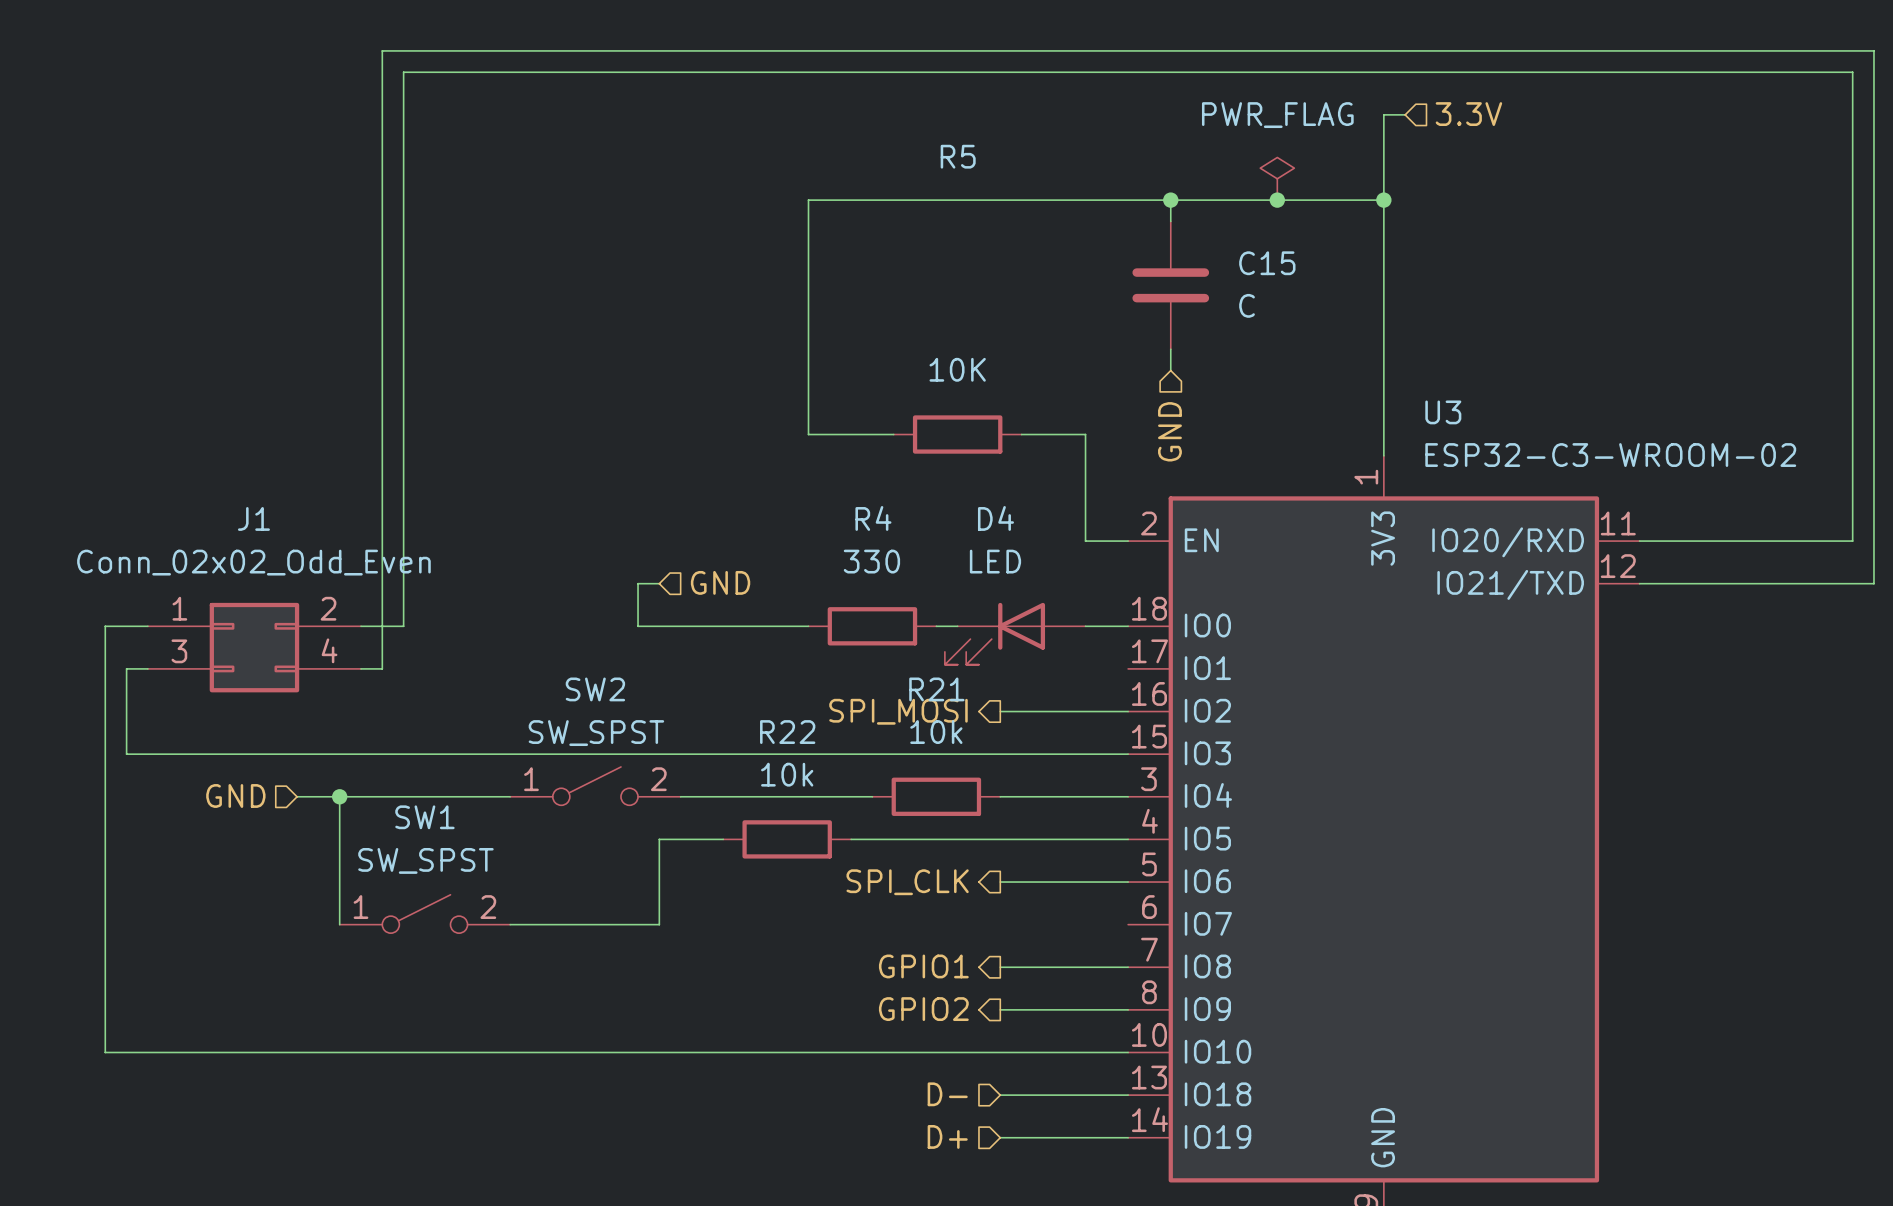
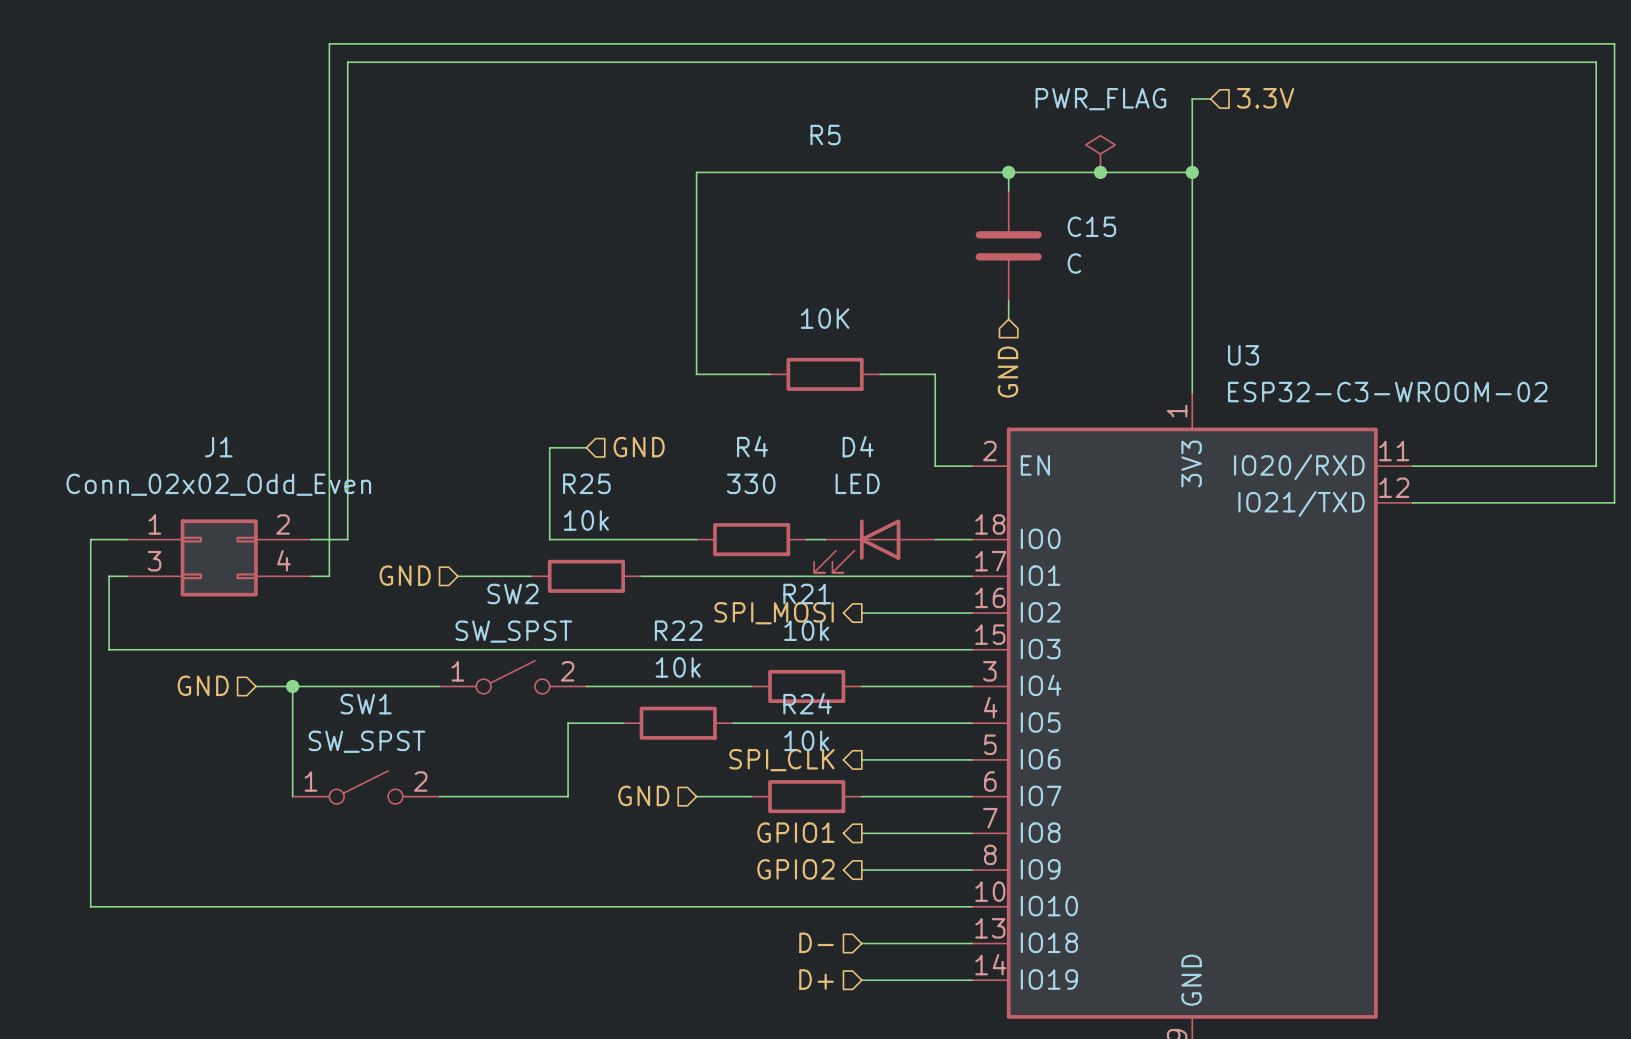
hierarchical label position: GND (720, 582) -> GND (639, 447)
wire: (638, 583) (659, 583) -> (549, 502) (549, 447) (586, 447)
hierarchical label: none -> GND (405, 575)
wire: none -> (457, 576) (531, 576)
R25: none -> 10k (586, 576)
wire: none -> (641, 576) (971, 576)
hierarchical label: none -> GND (643, 795)
wire: none -> (696, 796) (751, 796)
R24: none -> 10k (806, 796)
wire: none -> (861, 796) (971, 796)

